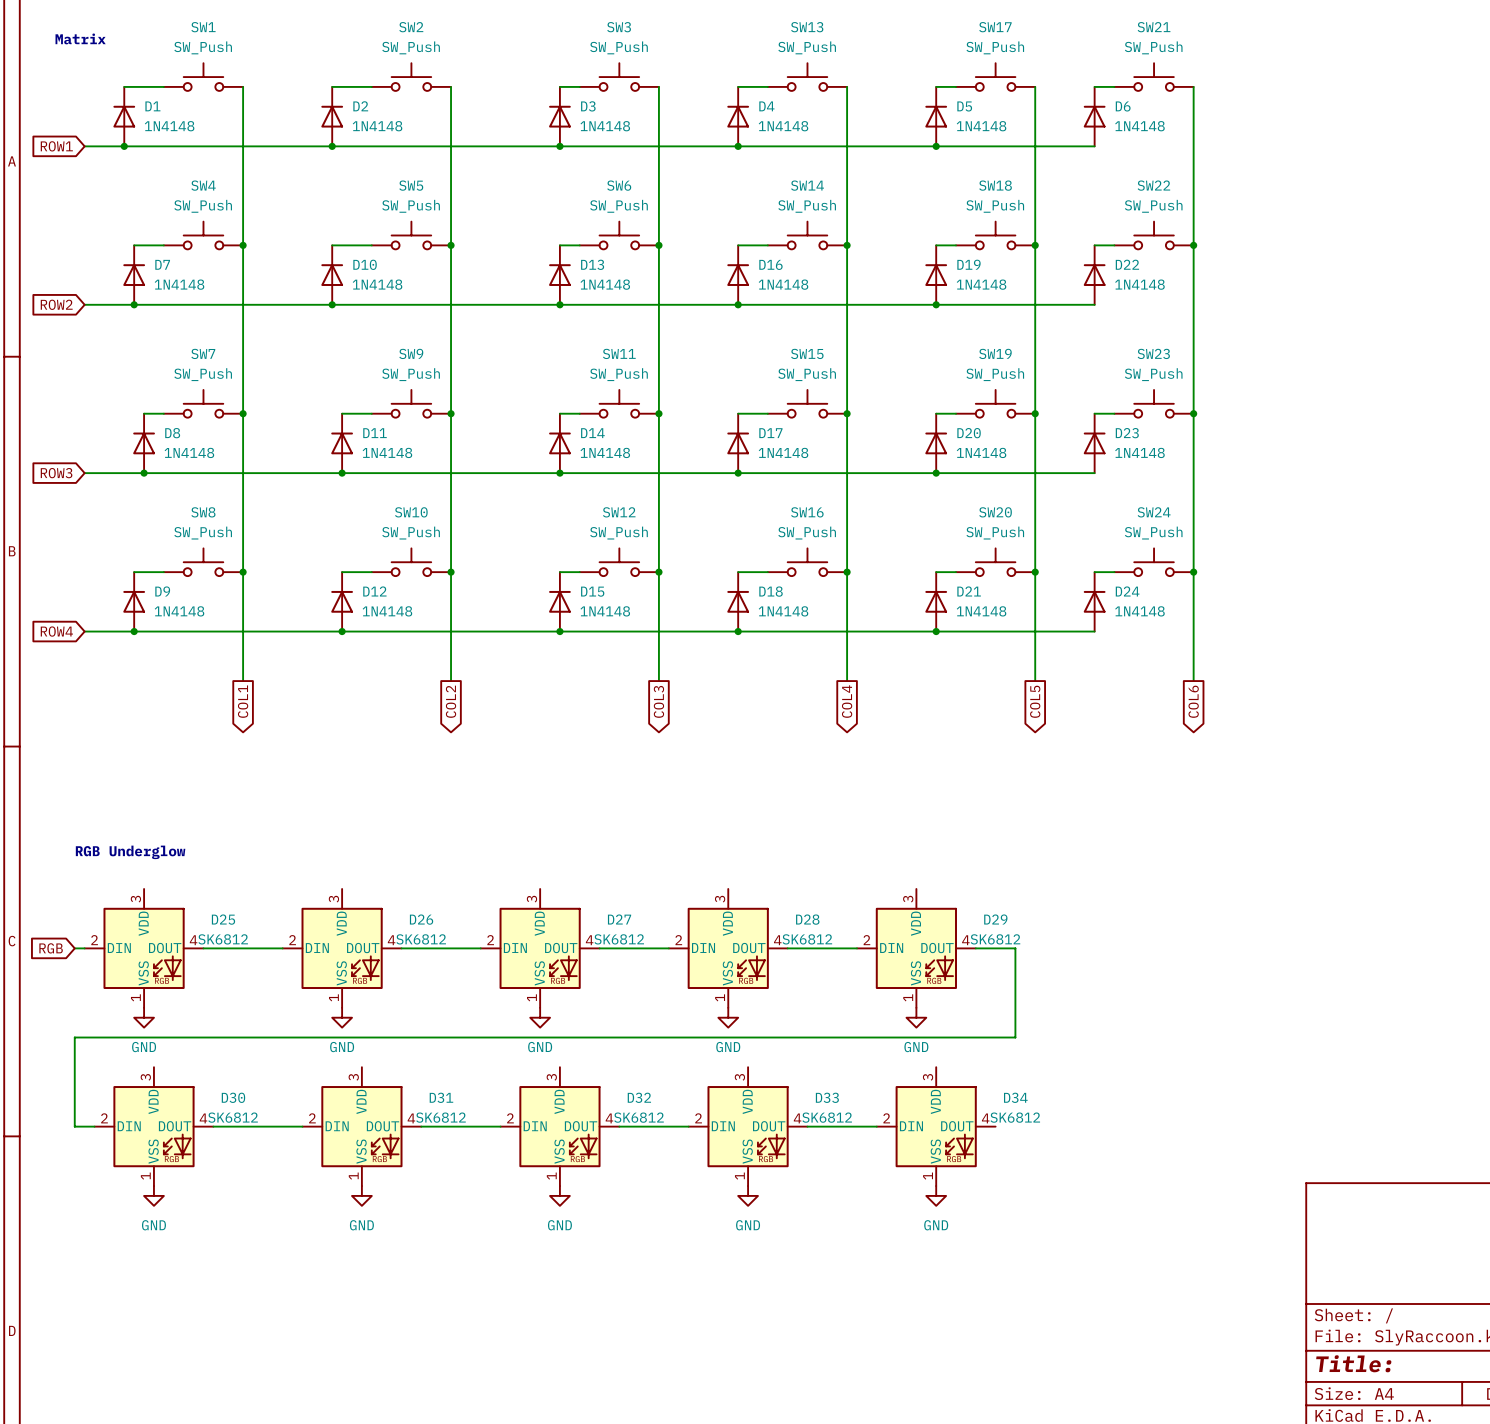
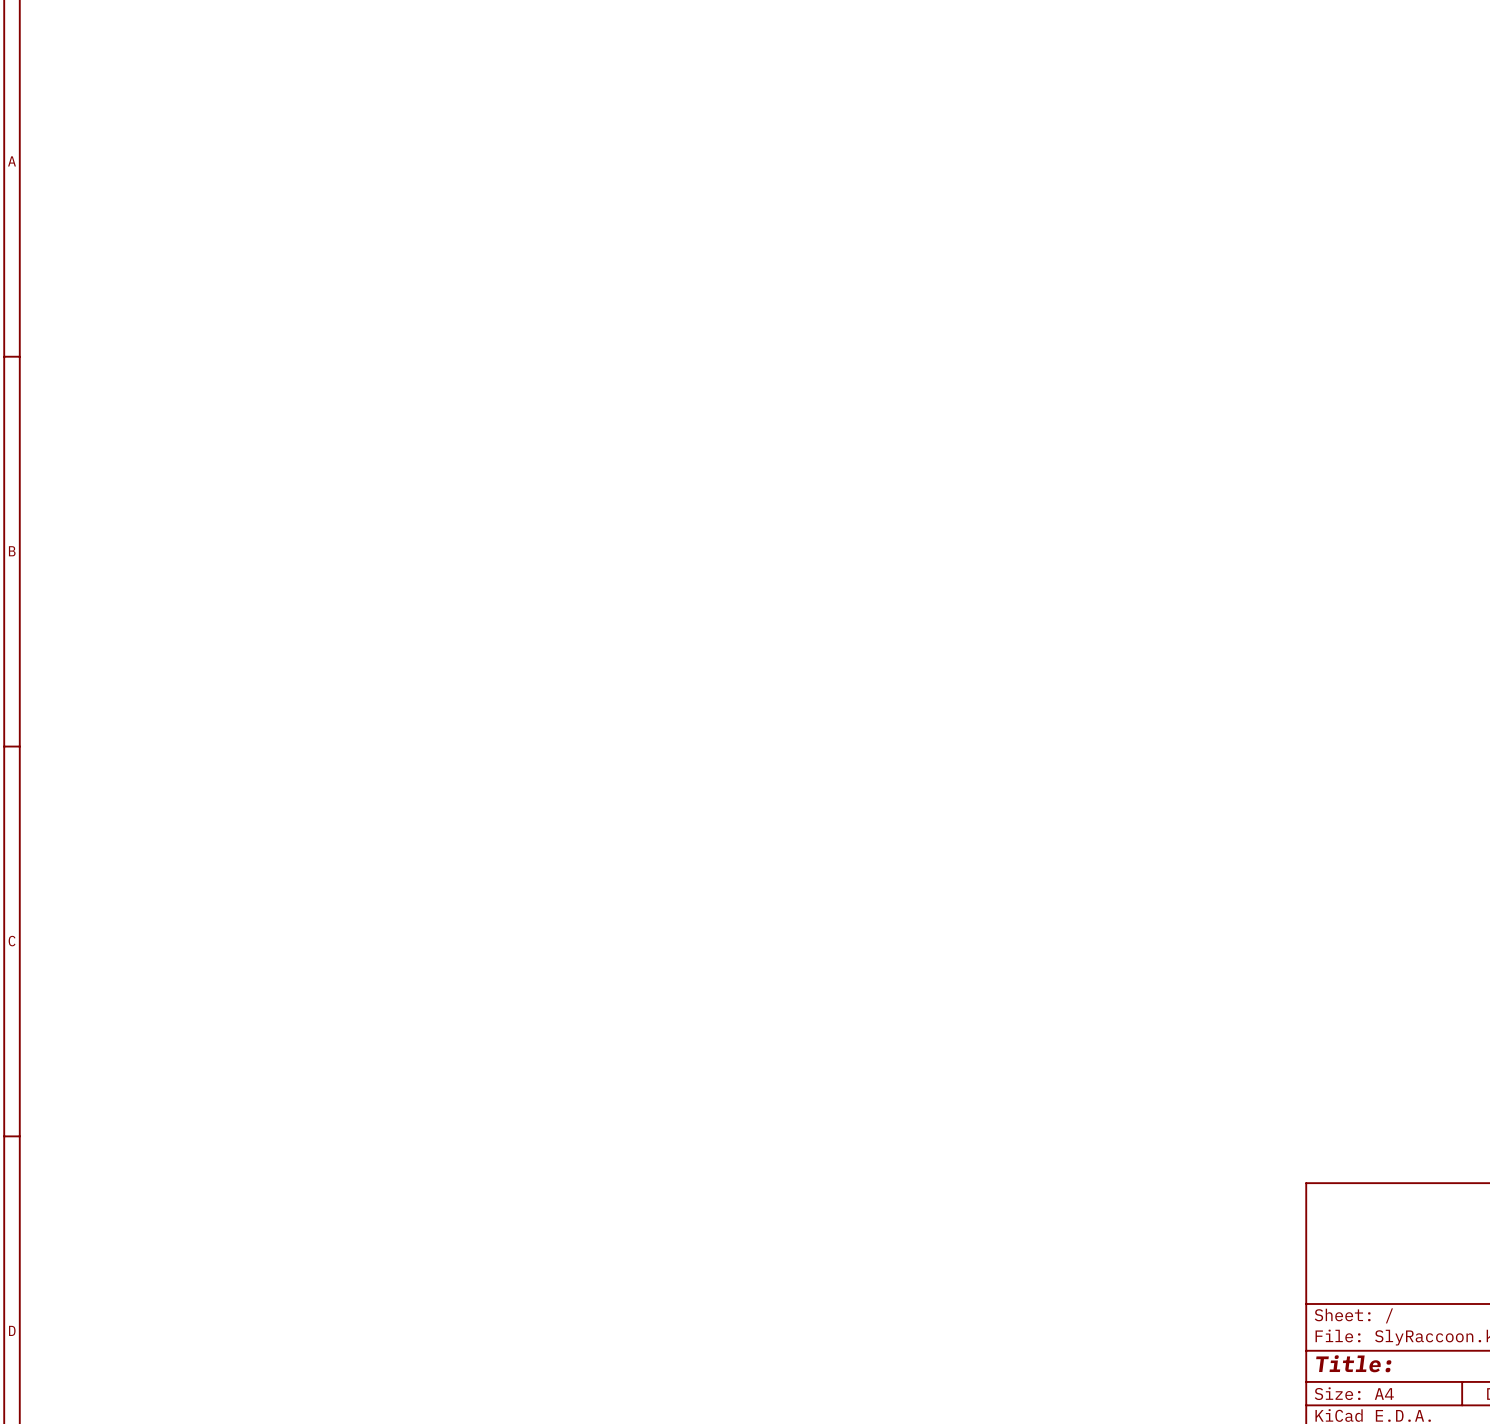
text: Matrix (80, 38) -> none
SW1: SW_Push (203, 77) -> none
SW2: SW_Push (411, 77) -> none
SW3: SW_Push (619, 77) -> none
SW13: SW_Push (807, 77) -> none
SW17: SW_Push (995, 77) -> none
SW21: SW_Push (1154, 77) -> none
wire: (124, 86) (163, 86) -> none
wire: (243, 86) (243, 681) -> none
wire: (332, 86) (371, 86) -> none
wire: (451, 86) (451, 681) -> none
wire: (559, 86) (579, 86) -> none
wire: (658, 86) (658, 681) -> none
wire: (738, 86) (767, 86) -> none
wire: (847, 86) (847, 681) -> none
wire: (936, 86) (956, 86) -> none
wire: (1035, 86) (1035, 681) -> none
wire: (1094, 86) (1114, 86) -> none
wire: (1193, 86) (1193, 681) -> none
D1: 1N4148 (124, 116) -> none
D2: 1N4148 (332, 116) -> none
D3: 1N4148 (559, 116) -> none
D4: 1N4148 (738, 116) -> none
D5: 1N4148 (936, 116) -> none
D6: 1N4148 (1094, 116) -> none
global label: ROW1 (56, 146) -> none
wire: (84, 146) (1094, 146) -> none
junction: (124, 146) -> none
junction: (332, 146) -> none
junction: (559, 146) -> none
junction: (738, 146) -> none
junction: (936, 146) -> none
SW4: SW_Push (203, 235) -> none
SW5: SW_Push (411, 235) -> none
SW6: SW_Push (619, 235) -> none
SW14: SW_Push (807, 235) -> none
SW18: SW_Push (995, 235) -> none
SW22: SW_Push (1154, 235) -> none
wire: (134, 245) (163, 245) -> none
junction: (243, 245) -> none
wire: (332, 245) (371, 245) -> none
junction: (451, 245) -> none
wire: (559, 245) (579, 245) -> none
junction: (658, 245) -> none
wire: (738, 245) (767, 245) -> none
junction: (847, 245) -> none
wire: (936, 245) (956, 245) -> none
junction: (1035, 245) -> none
wire: (1094, 245) (1114, 245) -> none
junction: (1193, 245) -> none
D7: 1N4148 (134, 275) -> none
D10: 1N4148 (332, 275) -> none
D13: 1N4148 (559, 275) -> none
D16: 1N4148 (738, 275) -> none
D19: 1N4148 (936, 275) -> none
D22: 1N4148 (1094, 275) -> none
global label: ROW2 (56, 304) -> none
wire: (84, 304) (1094, 304) -> none
junction: (134, 304) -> none
junction: (332, 304) -> none
junction: (559, 304) -> none
junction: (738, 304) -> none
junction: (936, 304) -> none
SW7: SW_Push (203, 403) -> none
SW9: SW_Push (411, 403) -> none
SW11: SW_Push (619, 403) -> none
SW15: SW_Push (807, 403) -> none
SW19: SW_Push (995, 403) -> none
SW23: SW_Push (1154, 403) -> none
wire: (144, 413) (163, 413) -> none
junction: (243, 413) -> none
wire: (342, 413) (371, 413) -> none
junction: (451, 413) -> none
wire: (559, 413) (579, 413) -> none
junction: (658, 413) -> none
wire: (738, 413) (767, 413) -> none
junction: (847, 413) -> none
wire: (936, 413) (956, 413) -> none
junction: (1035, 413) -> none
wire: (1094, 413) (1114, 413) -> none
junction: (1193, 413) -> none
D8: 1N4148 (144, 443) -> none
D11: 1N4148 (342, 443) -> none
D14: 1N4148 (559, 443) -> none
D17: 1N4148 (738, 443) -> none
D20: 1N4148 (936, 443) -> none
D23: 1N4148 (1094, 443) -> none
global label: ROW3 (56, 473) -> none
wire: (84, 473) (1094, 473) -> none
junction: (144, 473) -> none
junction: (342, 473) -> none
junction: (559, 473) -> none
junction: (738, 473) -> none
junction: (936, 473) -> none
SW8: SW_Push (203, 562) -> none
SW10: SW_Push (411, 562) -> none
SW12: SW_Push (619, 562) -> none
SW16: SW_Push (807, 562) -> none
SW20: SW_Push (995, 562) -> none
SW24: SW_Push (1154, 562) -> none
wire: (134, 572) (163, 572) -> none
junction: (243, 572) -> none
wire: (342, 572) (371, 572) -> none
junction: (451, 572) -> none
wire: (559, 572) (579, 572) -> none
junction: (658, 572) -> none
wire: (738, 572) (767, 572) -> none
junction: (847, 572) -> none
wire: (936, 572) (956, 572) -> none
junction: (1035, 572) -> none
wire: (1094, 572) (1114, 572) -> none
junction: (1193, 572) -> none
D9: 1N4148 (134, 601) -> none
D12: 1N4148 (342, 601) -> none
D15: 1N4148 (559, 601) -> none
D18: 1N4148 (738, 601) -> none
D21: 1N4148 (936, 601) -> none
D24: 1N4148 (1094, 601) -> none
global label: ROW4 (56, 631) -> none
wire: (84, 631) (1094, 631) -> none
junction: (134, 631) -> none
junction: (342, 631) -> none
junction: (559, 631) -> none
junction: (738, 631) -> none
junction: (936, 631) -> none
global label: COL1 (243, 701) -> none
global label: COL2 (451, 701) -> none
global label: COL3 (658, 701) -> none
global label: COL4 (847, 701) -> none
global label: COL5 (1035, 701) -> none
global label: COL6 (1193, 701) -> none
text: RGB Underglow (130, 852) -> none
global label: RGB (51, 948) -> none
wire: (74, 948) (84, 948) -> none
D25: SK6812 (144, 948) -> none
wire: (203, 948) (282, 948) -> none
D26: SK6812 (342, 948) -> none
wire: (401, 948) (480, 948) -> none
D27: SK6812 (540, 948) -> none
wire: (599, 948) (668, 948) -> none
D28: SK6812 (728, 948) -> none
wire: (787, 948) (856, 948) -> none
D29: SK6812 (916, 948) -> none
wire: (975, 948) (1015, 948) (1015, 1037) (74, 1037) (74, 1126) (94, 1126) -> none
power symbol: GND (144, 1017) -> none
power symbol: GND (342, 1017) -> none
power symbol: GND (540, 1017) -> none
power symbol: GND (728, 1017) -> none
power symbol: GND (916, 1017) -> none
D30: SK6812 (153, 1126) -> none
wire: (213, 1126) (302, 1126) -> none
D31: SK6812 (361, 1126) -> none
wire: (421, 1126) (500, 1126) -> none
D32: SK6812 (559, 1126) -> none
wire: (619, 1126) (688, 1126) -> none
D33: SK6812 (748, 1126) -> none
wire: (807, 1126) (876, 1126) -> none
D34: SK6812 (936, 1126) -> none
power symbol: GND (153, 1195) -> none
power symbol: GND (361, 1195) -> none
power symbol: GND (559, 1195) -> none
power symbol: GND (748, 1195) -> none
power symbol: GND (936, 1195) -> none

